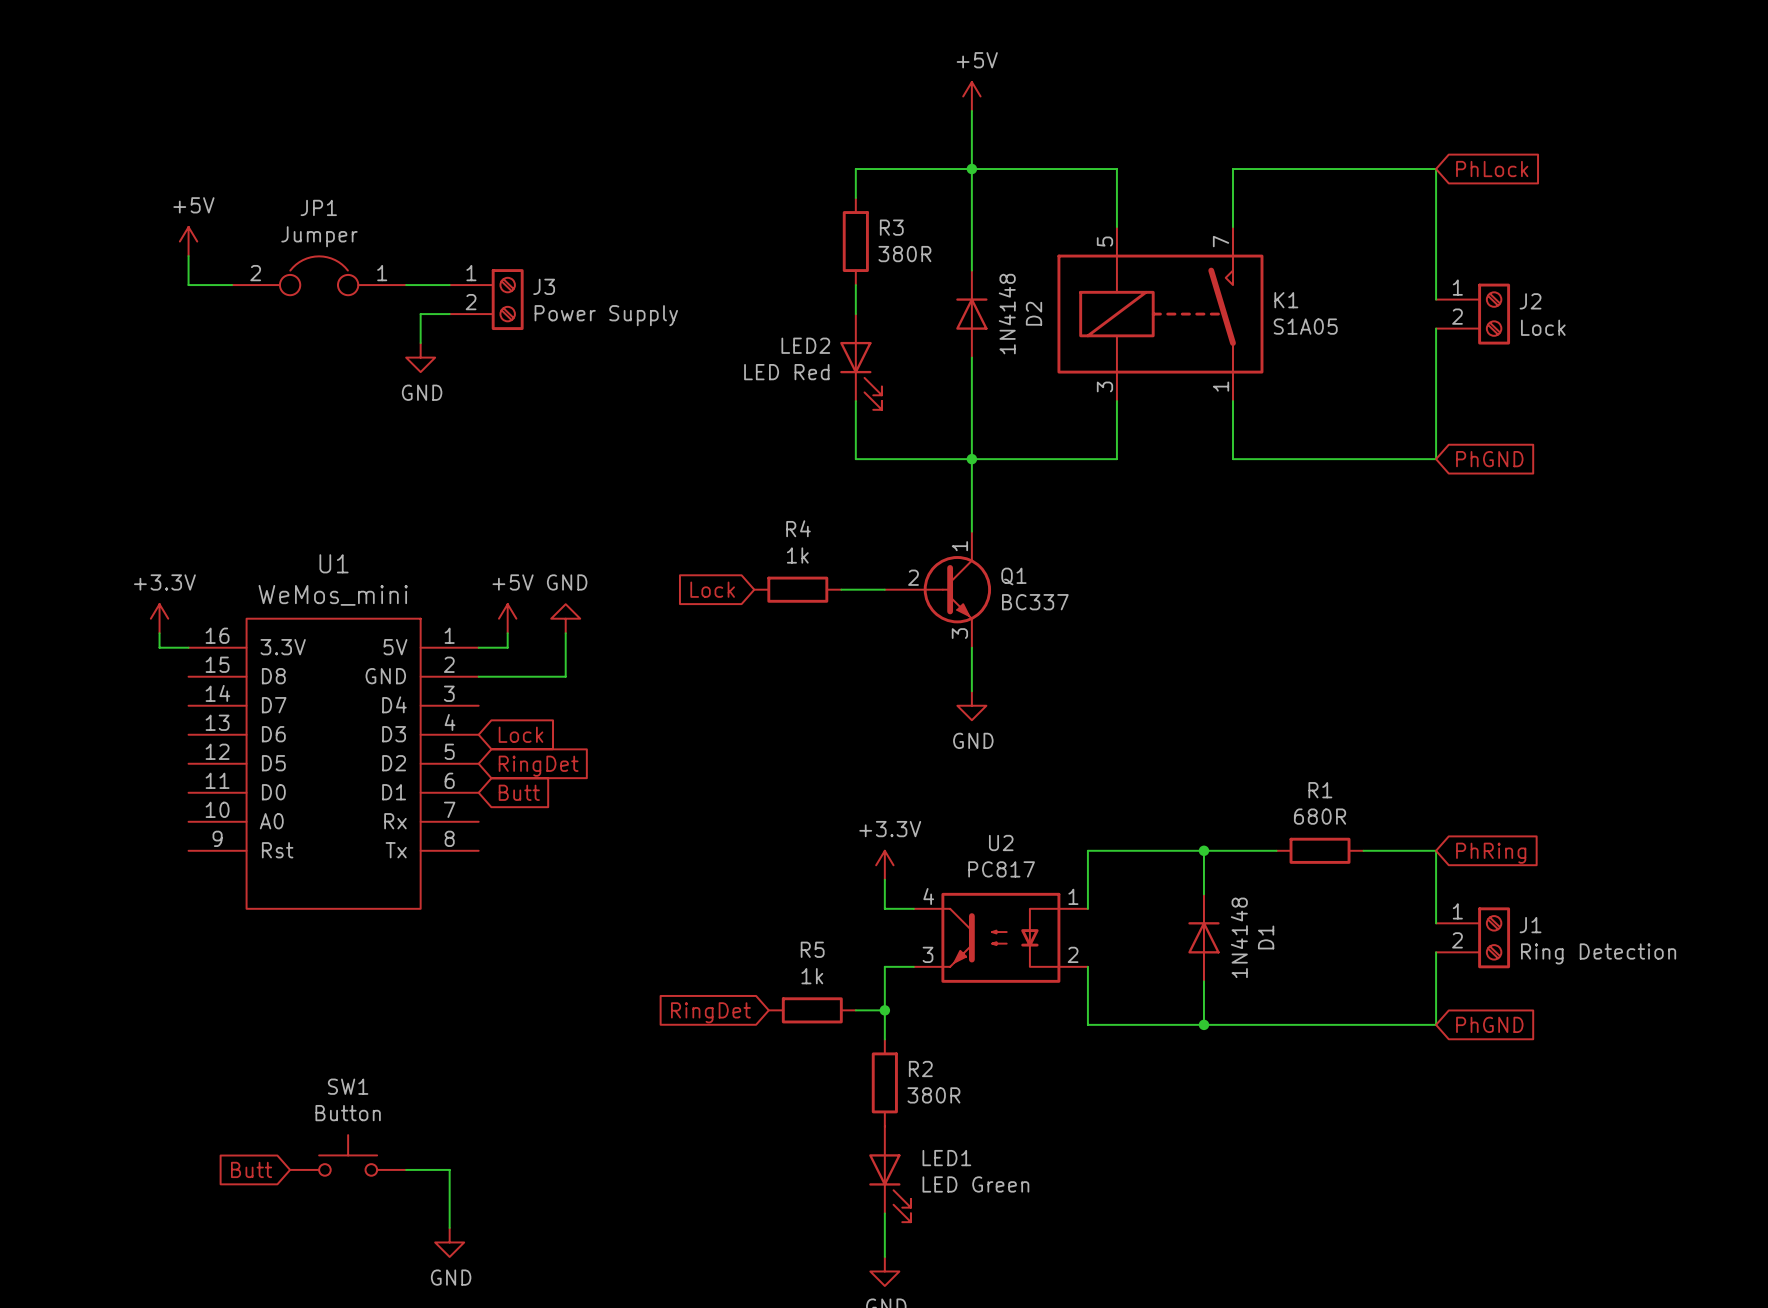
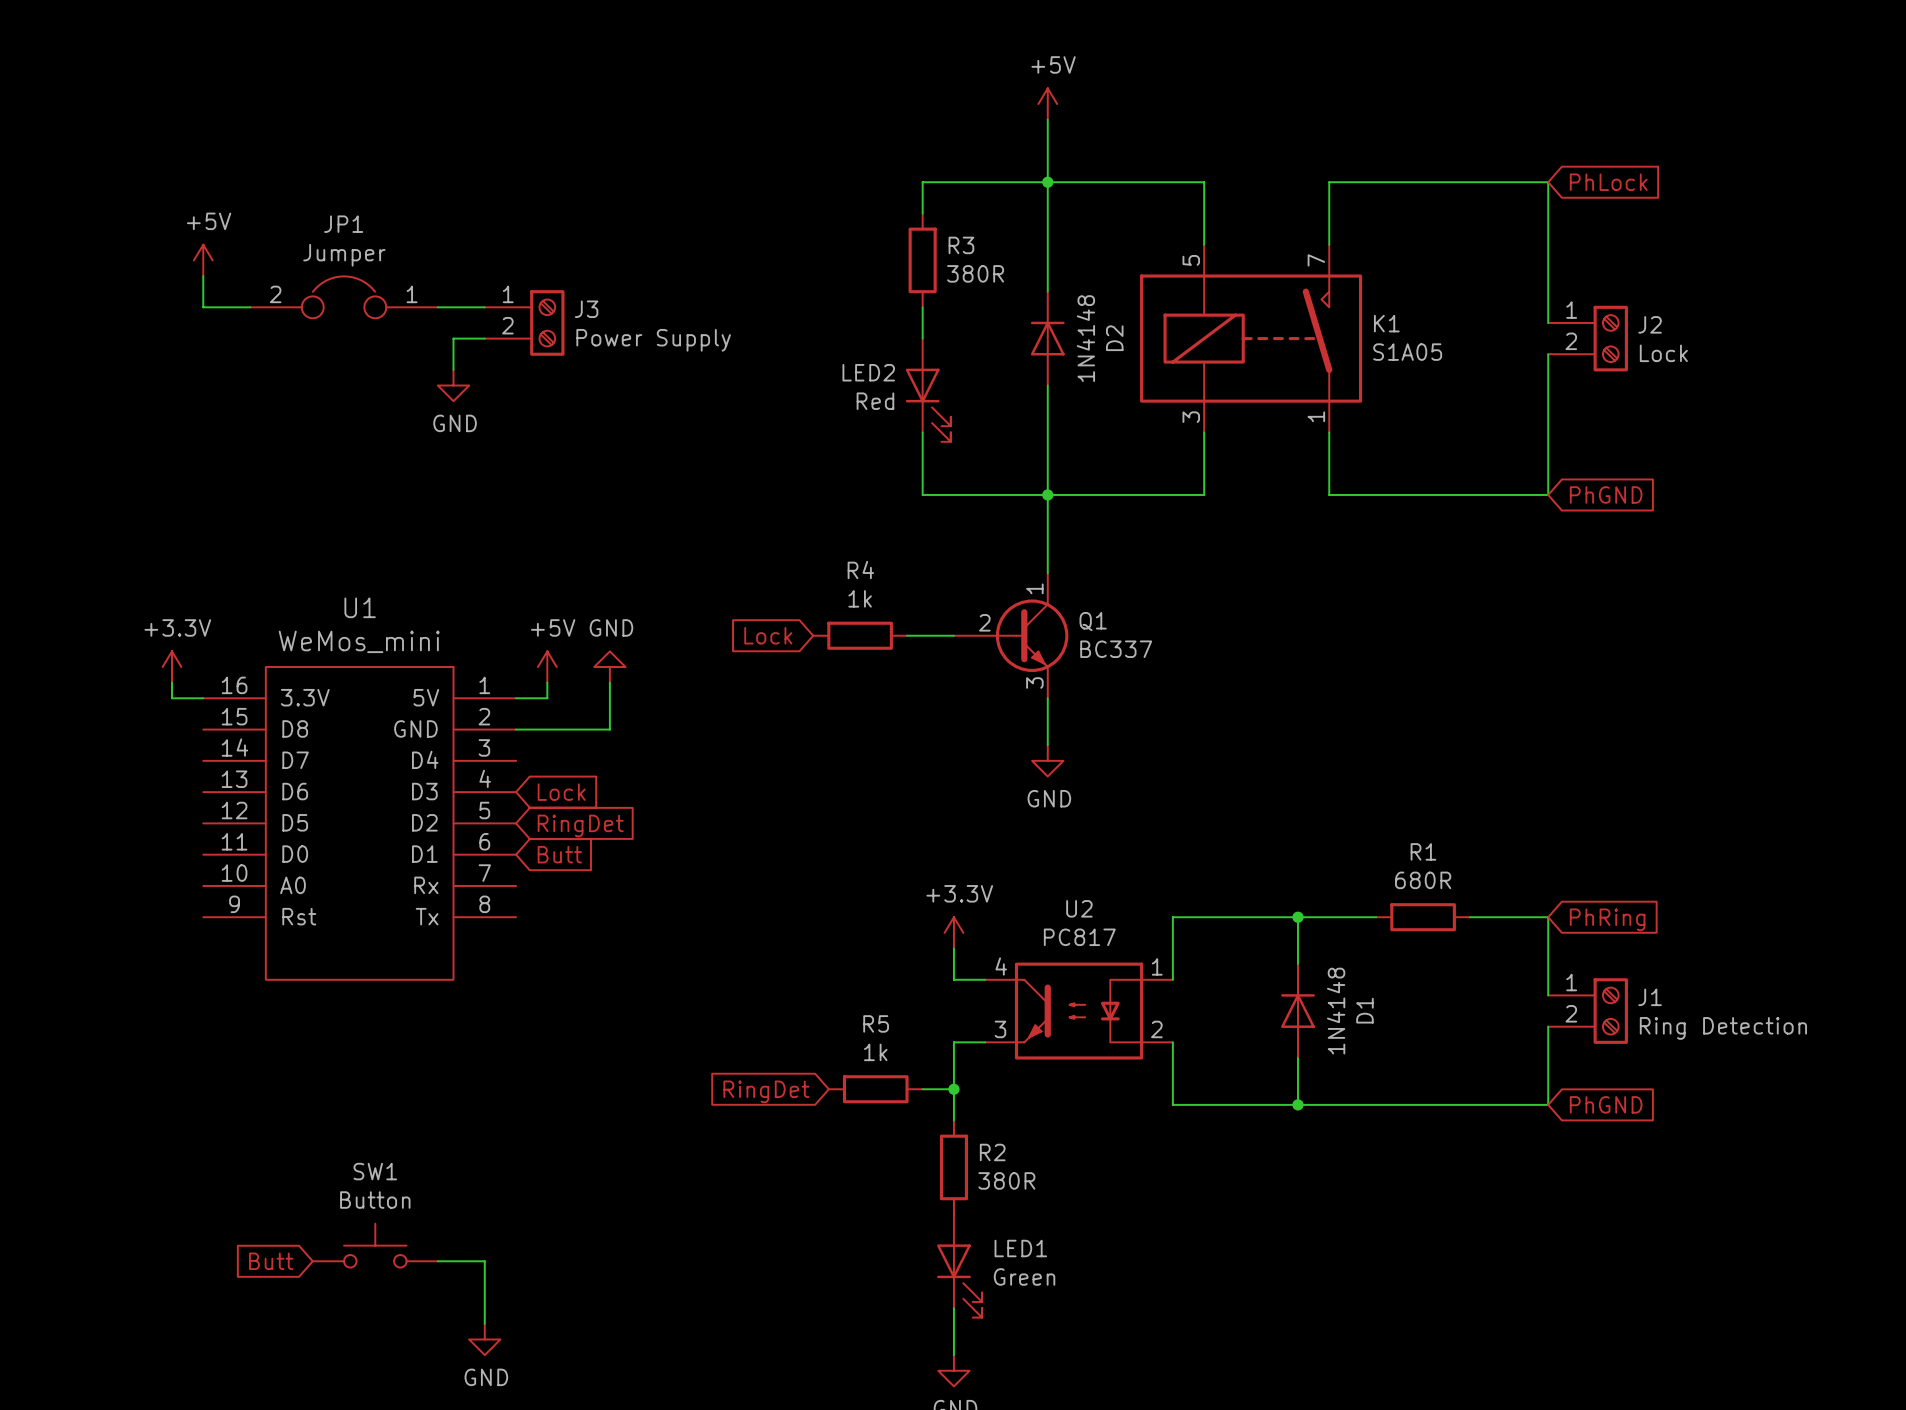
LED2 value: LED Red (786, 372) -> Red (875, 401)
LED1 value: LED Green (975, 1184) -> Green (1024, 1276)

